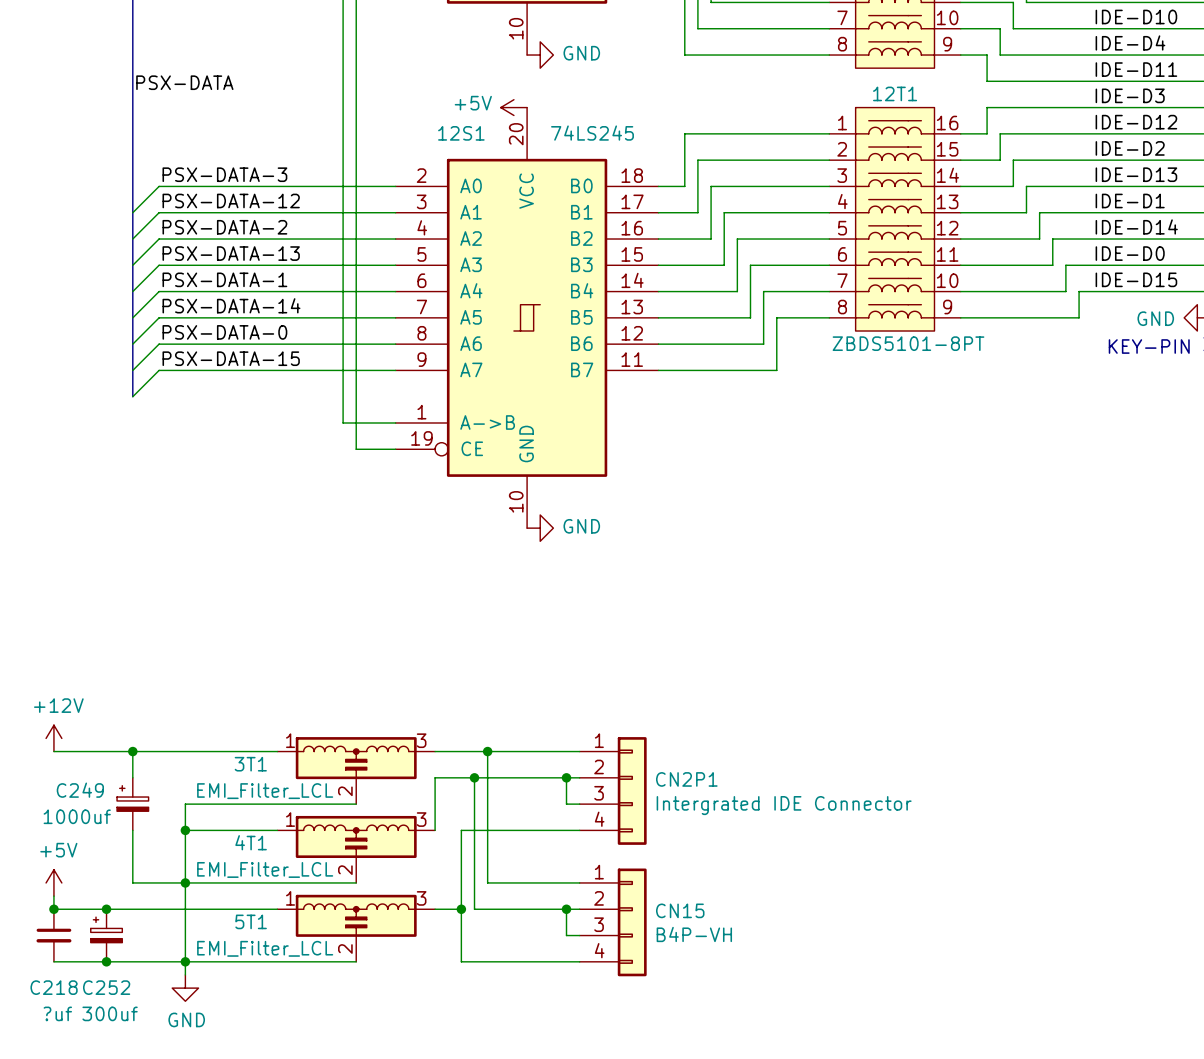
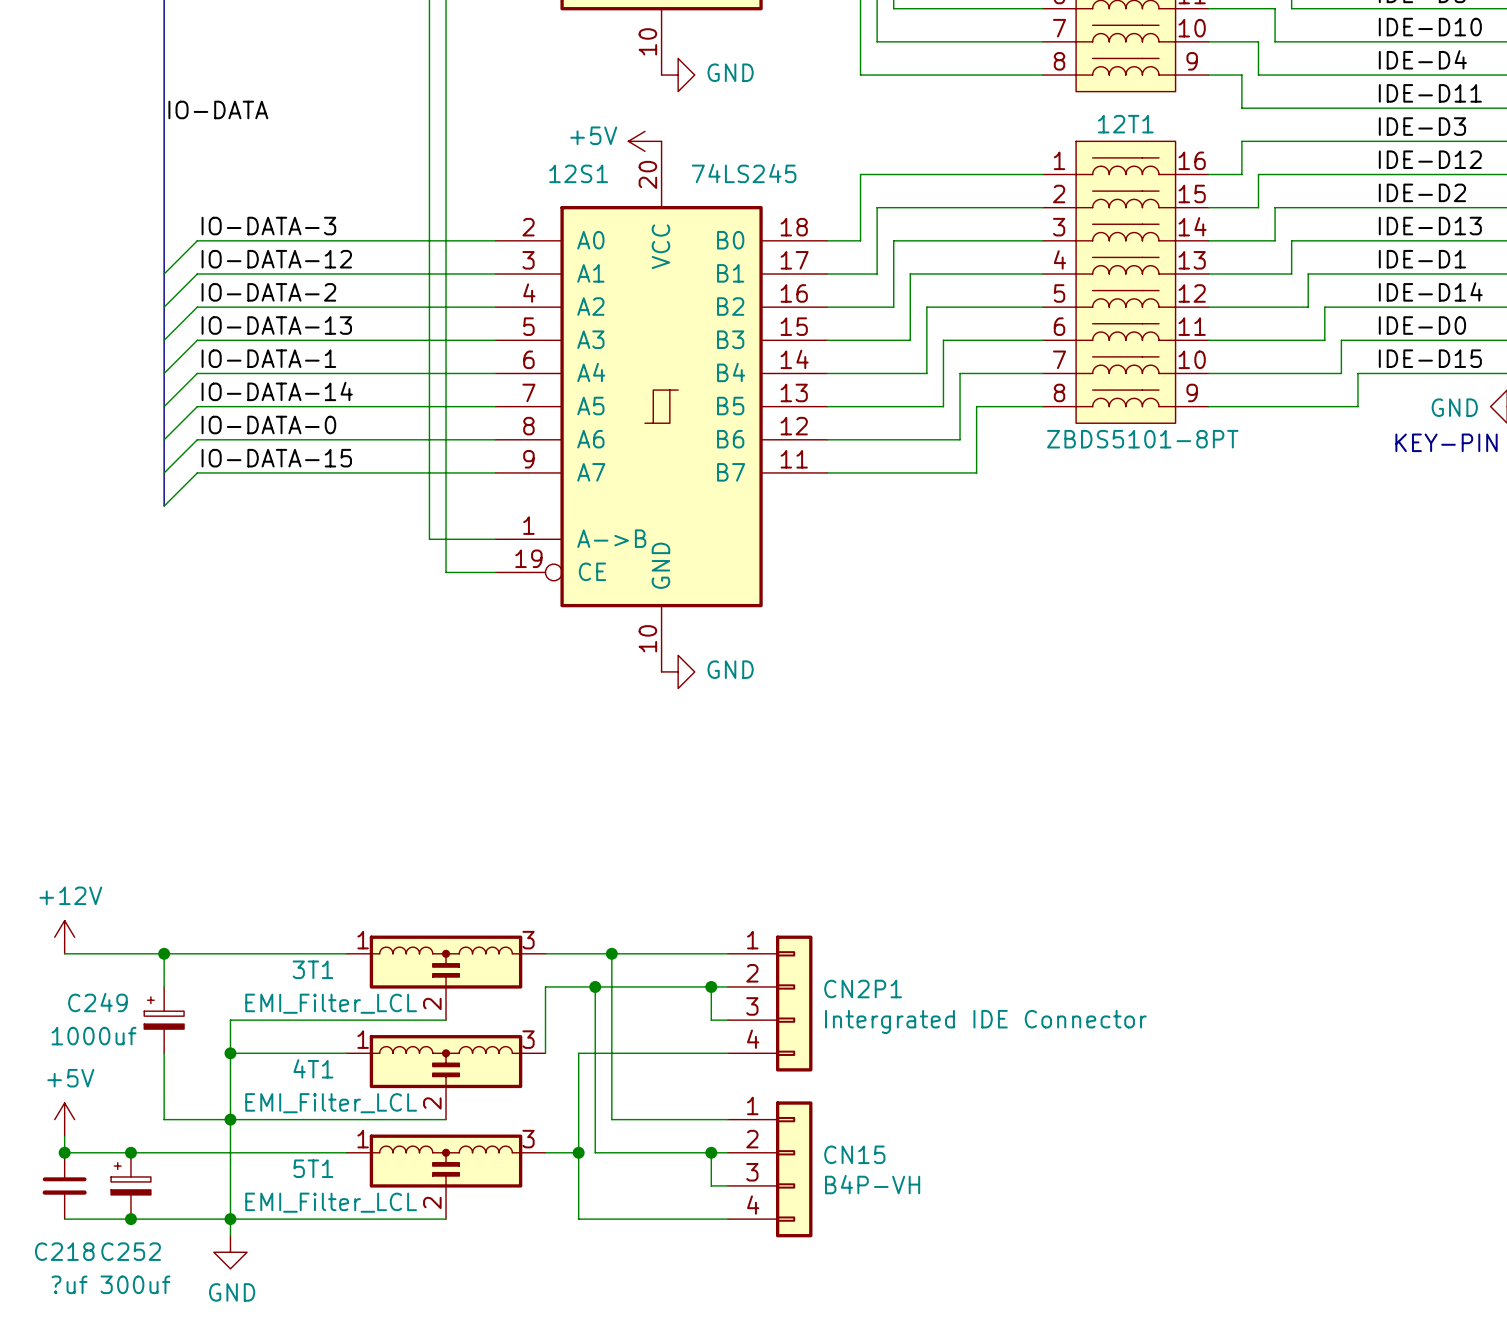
label: PSX-DATA (184, 82) -> IO-DATA (218, 109)
label: PSX-DATA-3 (224, 174) -> IO-DATA-3 (268, 226)
label: PSX-DATA-12 (231, 200) -> IO-DATA-12 (276, 259)
label: PSX-DATA-2 (224, 227) -> IO-DATA-2 (268, 292)
label: PSX-DATA-13 (231, 253) -> IO-DATA-13 (276, 325)
label: PSX-DATA-1 (224, 279) -> IO-DATA-1 (268, 358)
label: PSX-DATA-14 (231, 305) -> IO-DATA-14 (277, 391)
label: PSX-DATA-0 (224, 332) -> IO-DATA-0 (268, 425)
label: PSX-DATA-15 (231, 358) -> IO-DATA-15 (276, 458)

